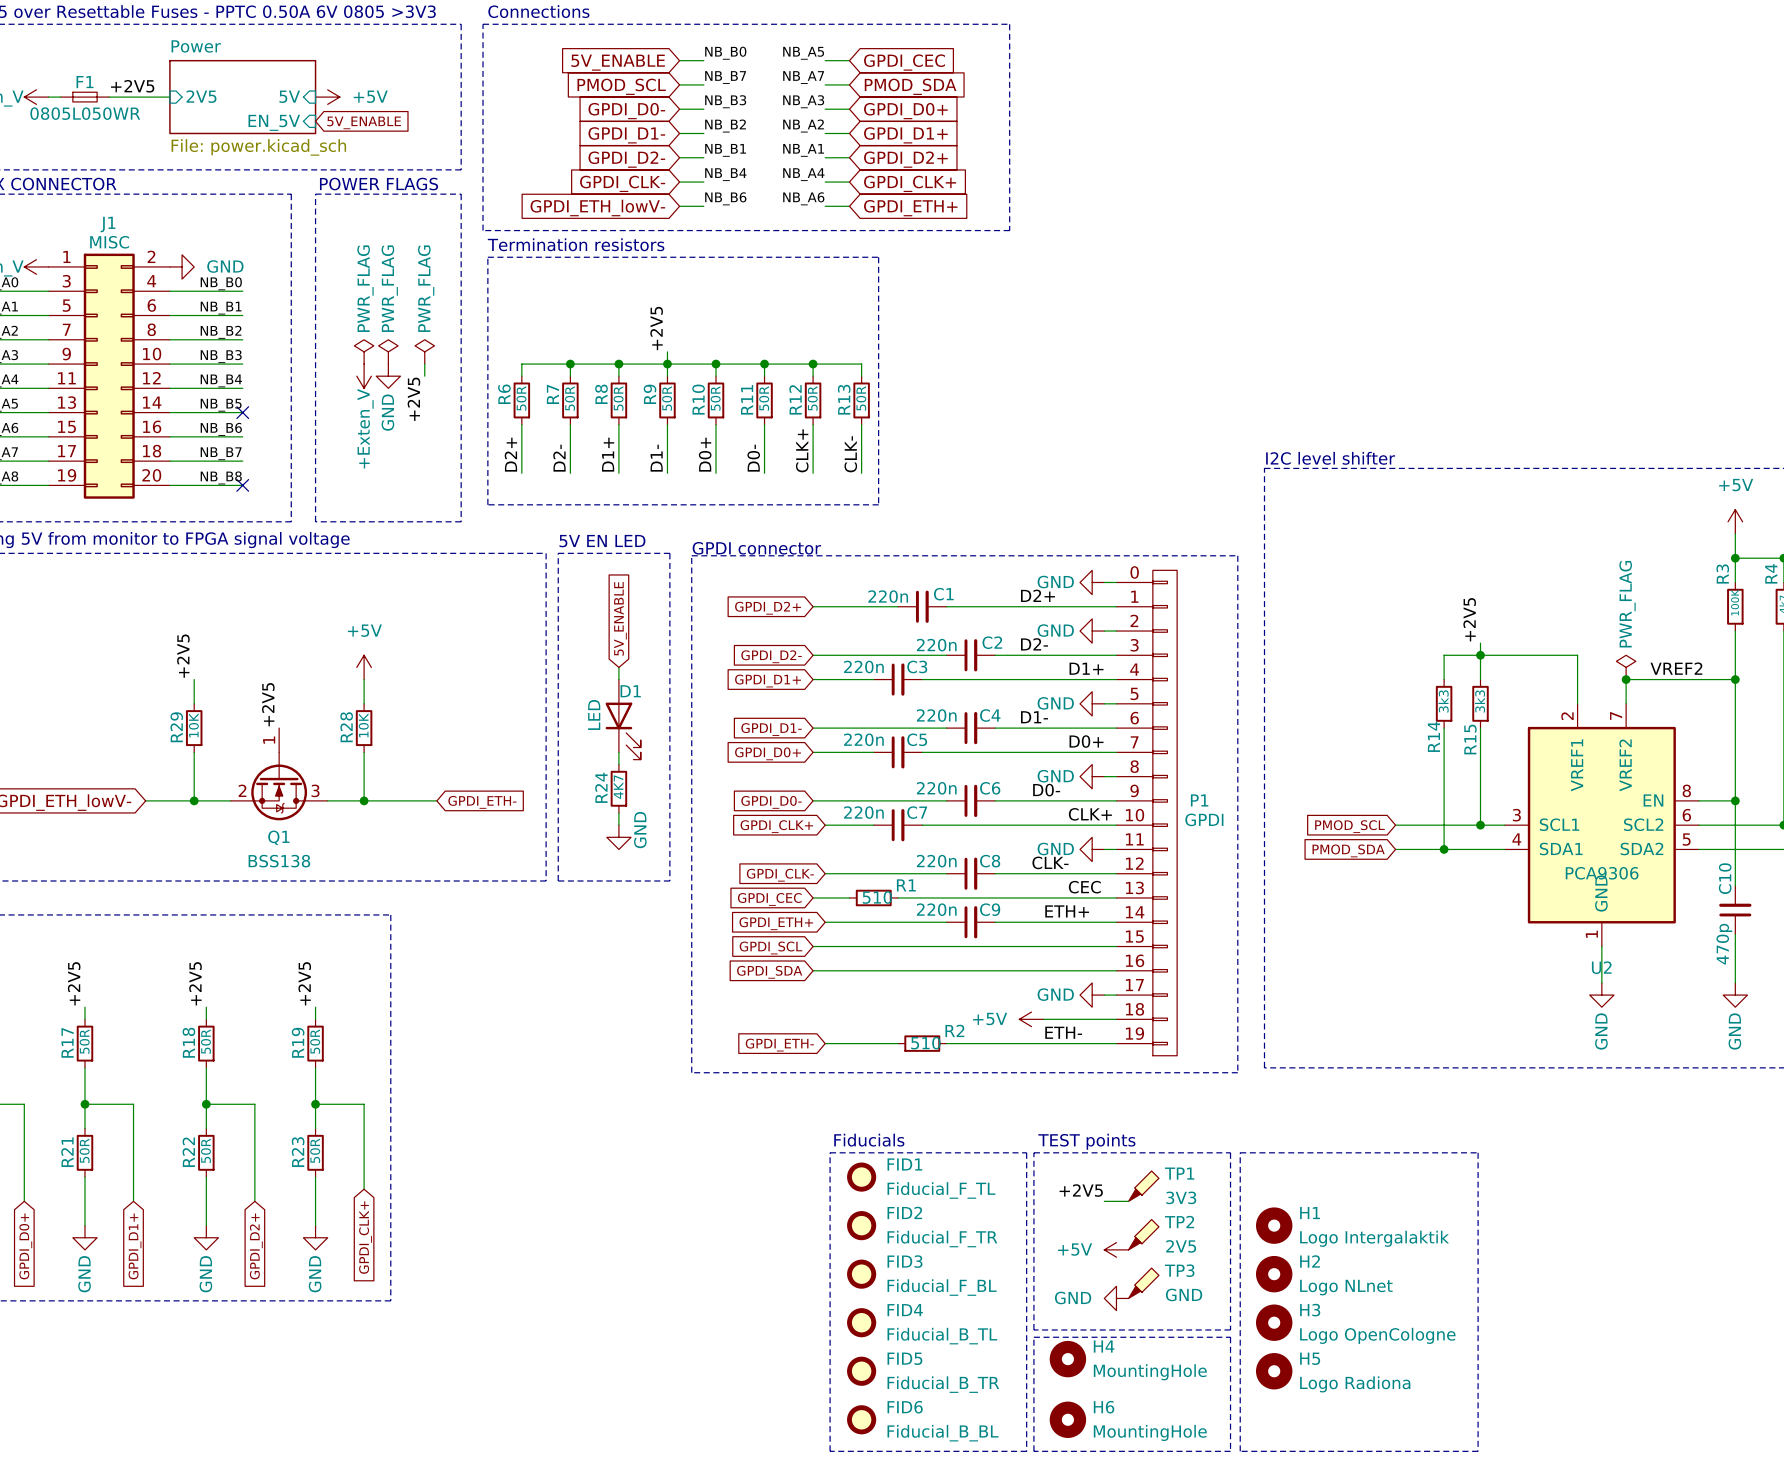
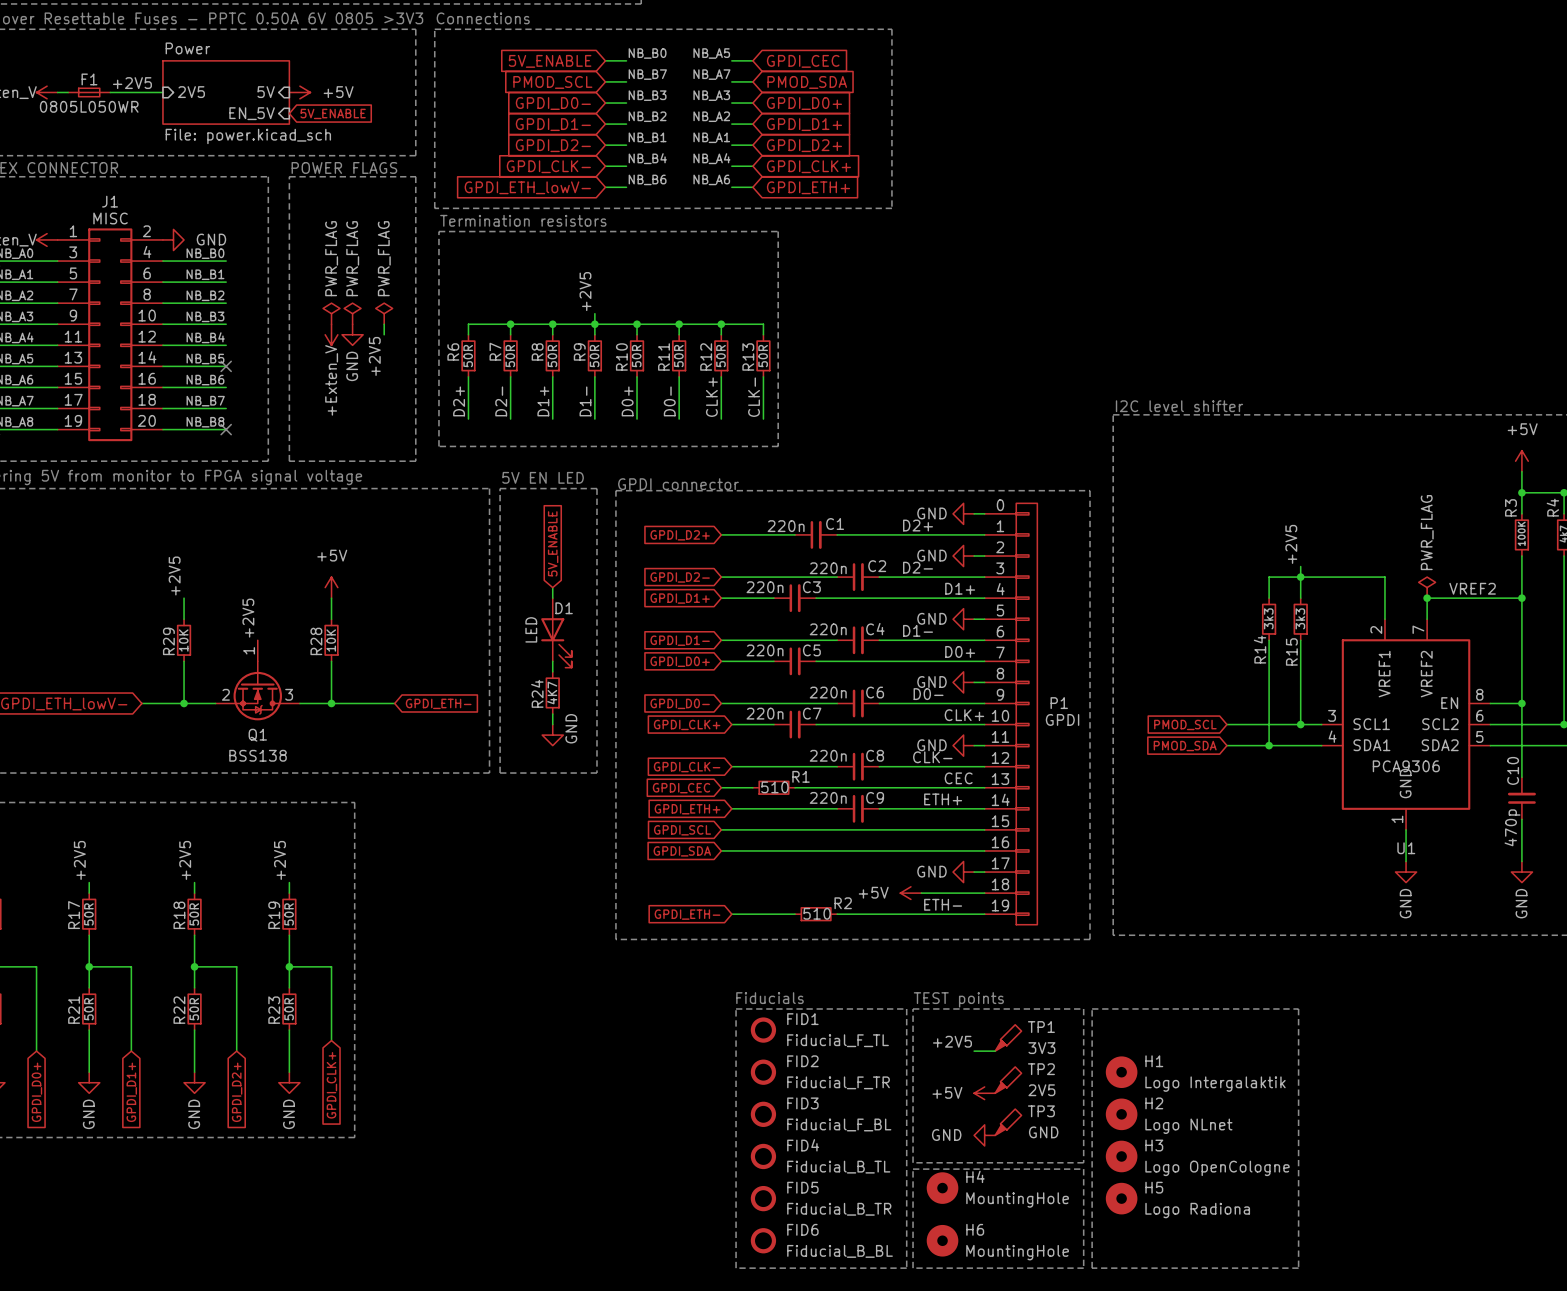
U2 name: U2 (1601, 967) -> U1 (1406, 848)

